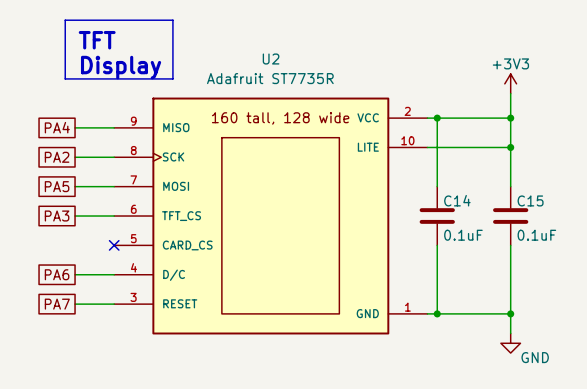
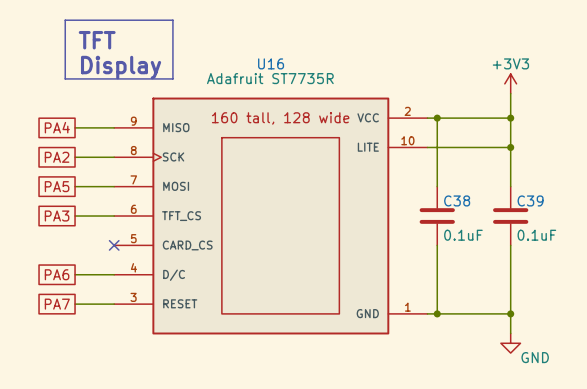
U2 name: U2 (271, 59) -> U16 (271, 63)
C14 name: C14 (457, 200) -> C38 (457, 200)
C15 name: C15 (530, 200) -> C39 (530, 200)

